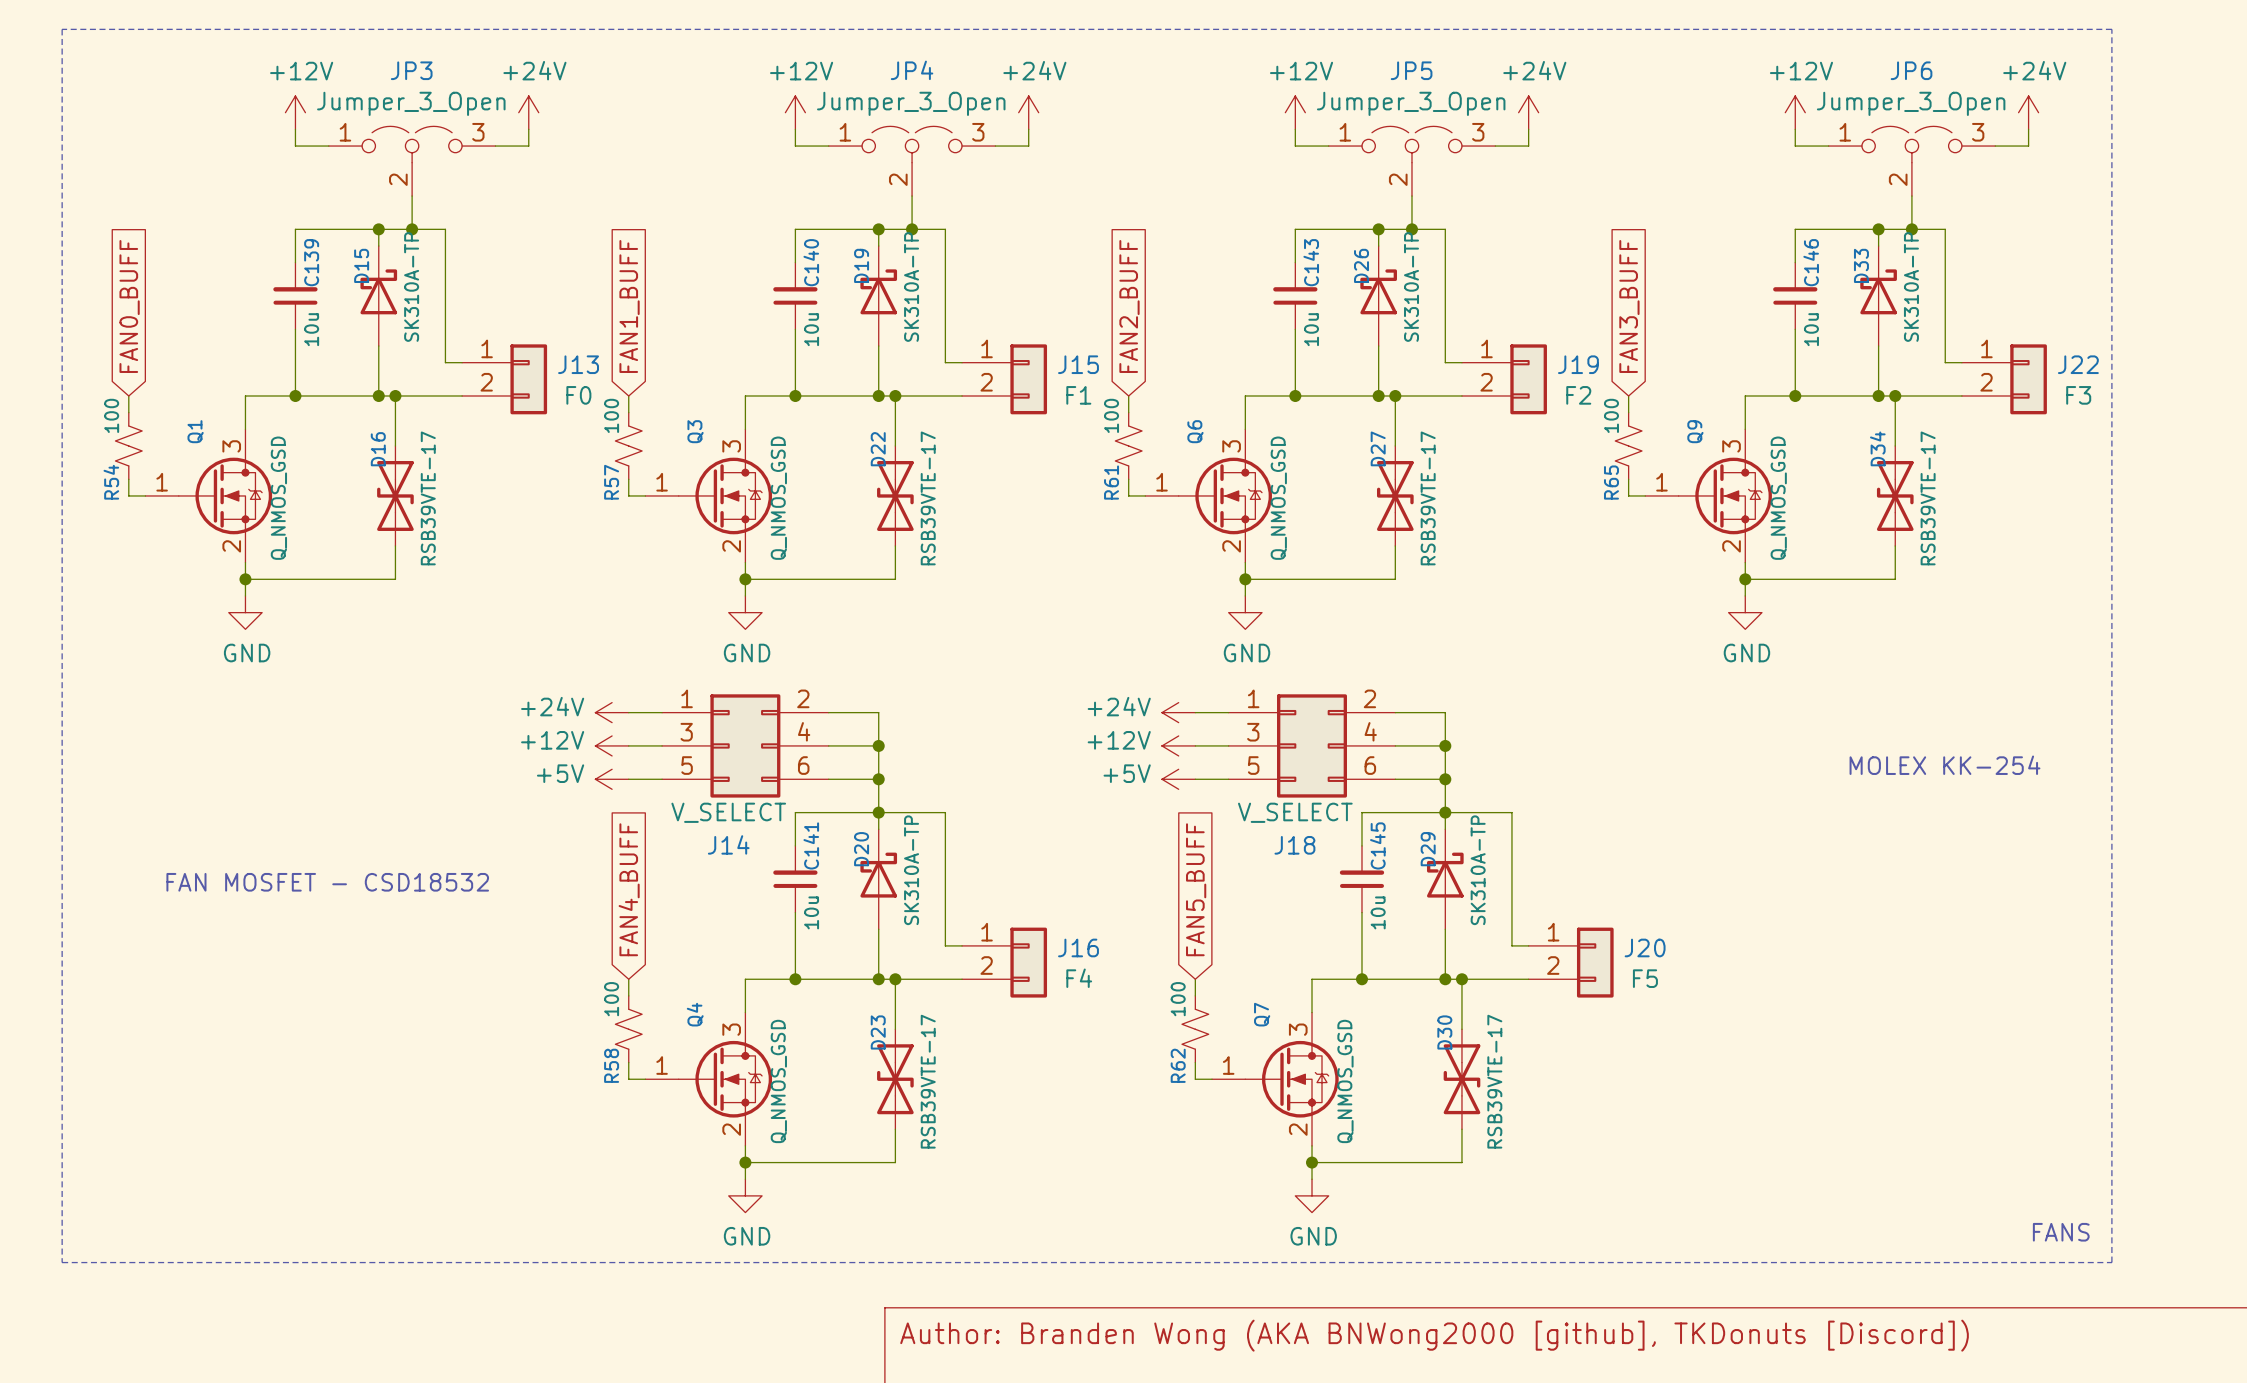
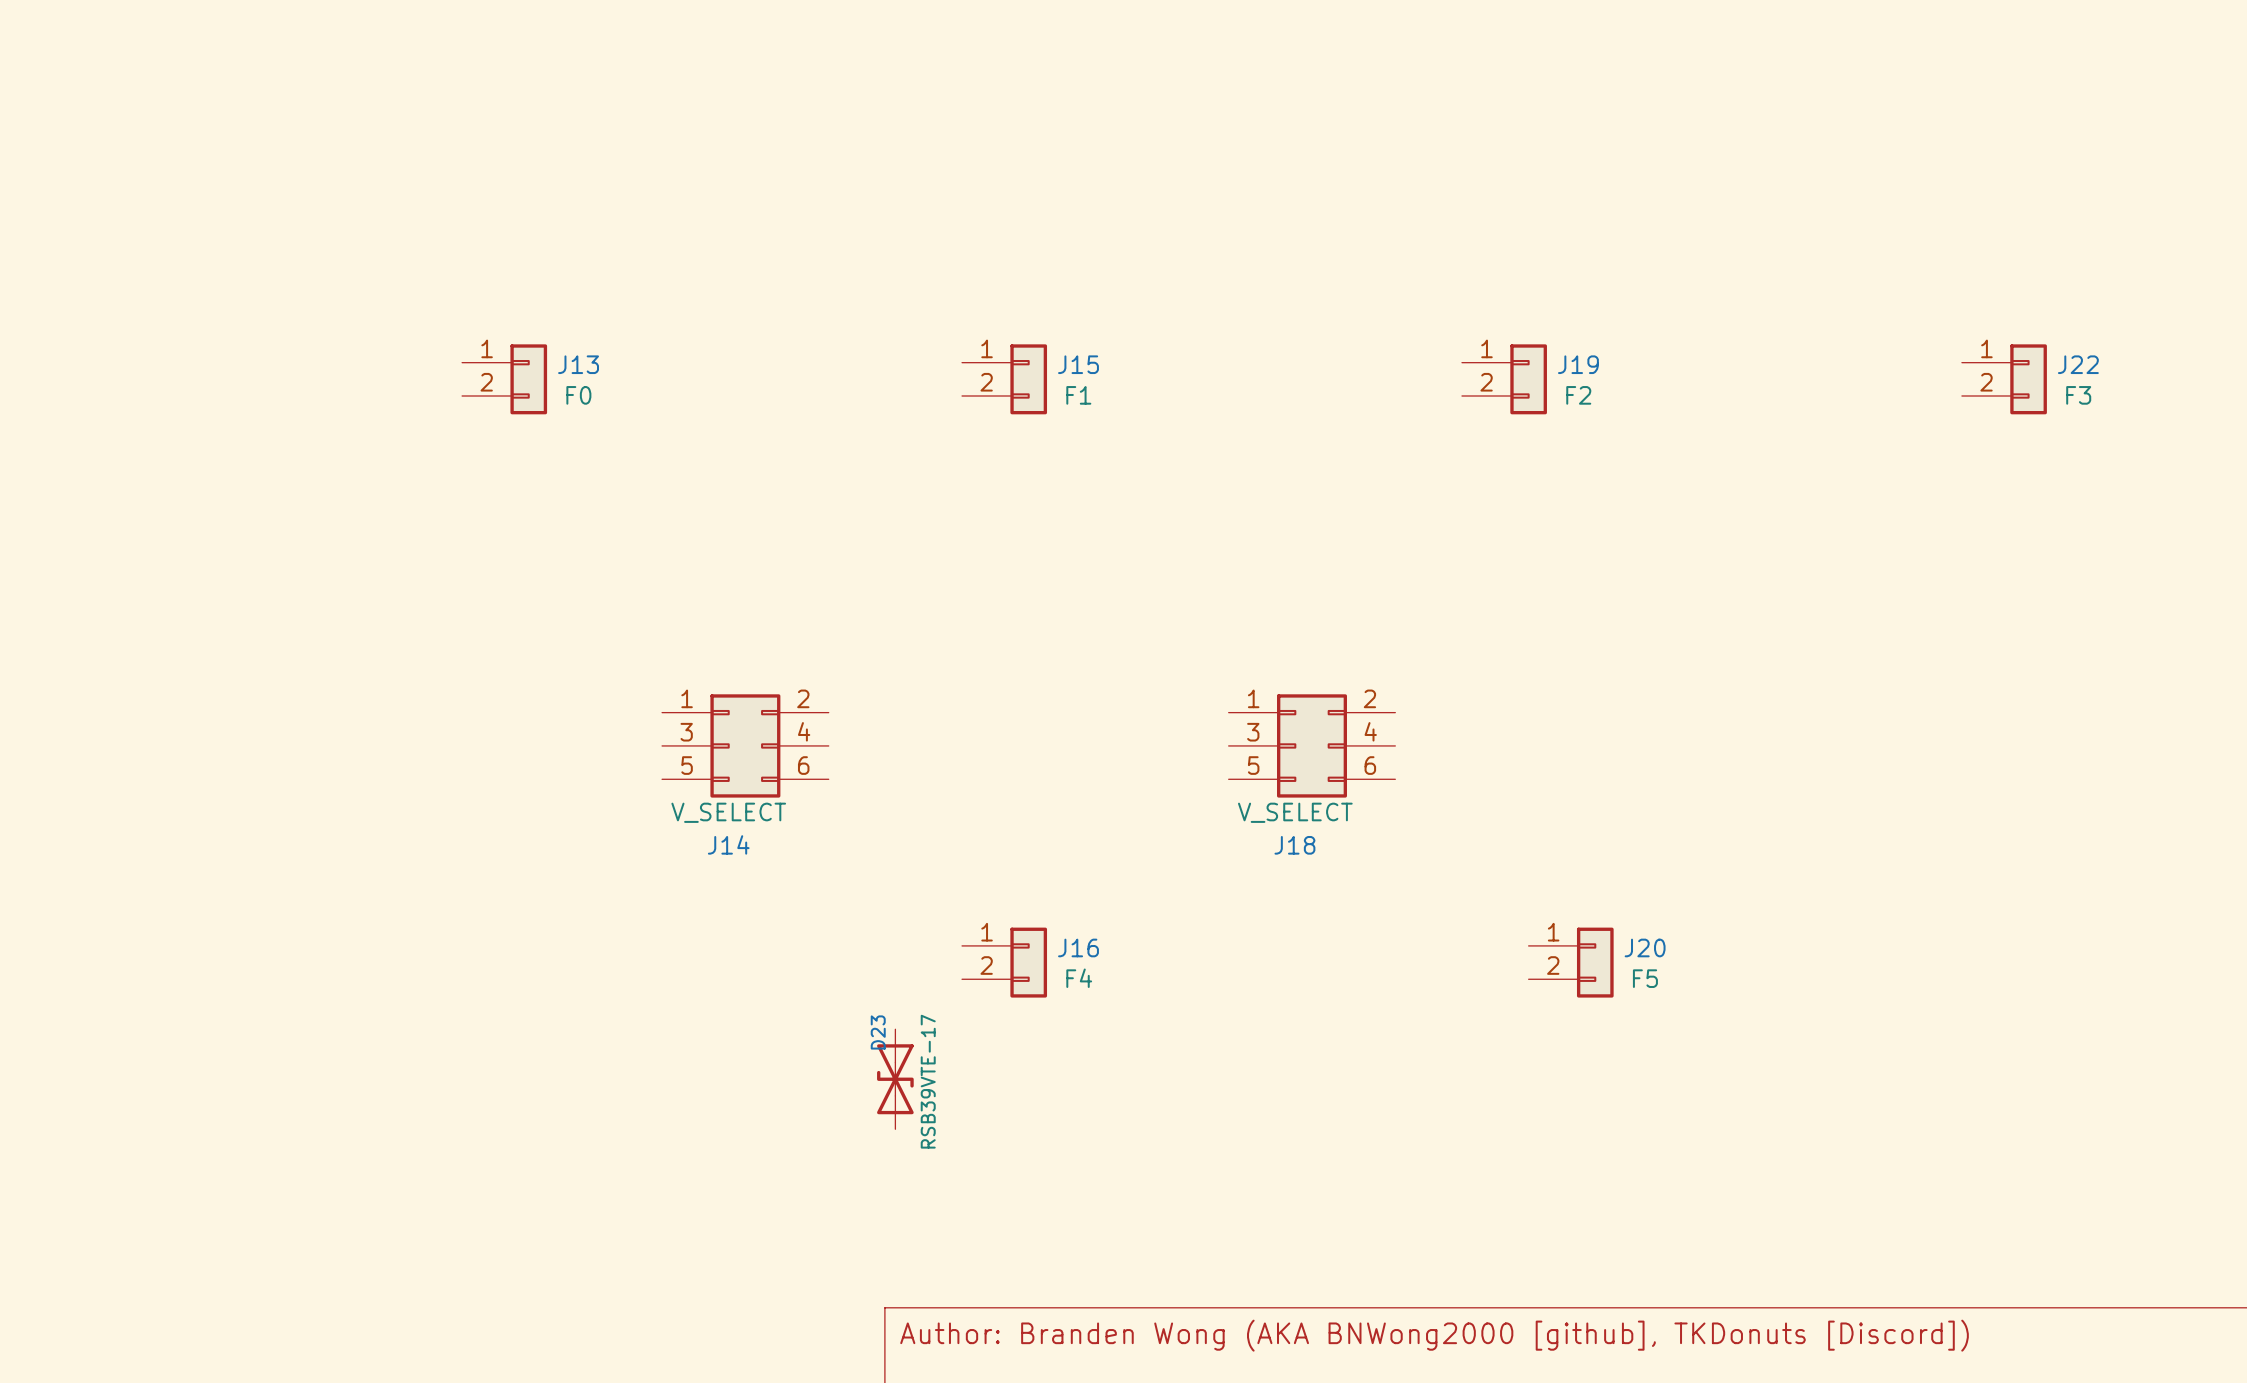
line: (62, 29) (62, 1262) (2111, 1262) (2111, 29) (62, 29) -> none
power symbol: +12V (295, 112) -> none
power symbol: +24V (528, 112) -> none
power symbol: +12V (795, 112) -> none
power symbol: +24V (1028, 112) -> none
power symbol: +12V (1295, 112) -> none
power symbol: +24V (1528, 112) -> none
power symbol: +12V (1795, 112) -> none
power symbol: +24V (2028, 112) -> none
wire: (295, 129) (295, 146) (328, 146) -> none
wire: (528, 129) (528, 146) (495, 146) -> none
wire: (795, 129) (795, 146) (828, 146) -> none
wire: (1028, 129) (1028, 146) (995, 146) -> none
wire: (1295, 129) (1295, 146) (1328, 146) -> none
wire: (1528, 129) (1528, 146) (1495, 146) -> none
wire: (1795, 129) (1795, 146) (1828, 146) -> none
wire: (2028, 129) (2028, 146) (1995, 146) -> none
JP3: Jumper_3_Open (412, 161) -> none
JP4: Jumper_3_Open (912, 161) -> none
JP5: Jumper_3_Open (1411, 161) -> none
JP6: Jumper_3_Open (1911, 161) -> none
wire: (412, 196) (412, 229) -> none
wire: (912, 196) (912, 229) -> none
wire: (1411, 196) (1411, 229) -> none
wire: (1911, 196) (1911, 229) -> none
wire: (378, 229) (378, 246) -> none
junction: (378, 229) -> none
junction: (412, 229) -> none
wire: (878, 229) (878, 246) -> none
junction: (878, 229) -> none
junction: (912, 229) -> none
wire: (1378, 229) (1378, 246) -> none
junction: (1378, 229) -> none
junction: (1411, 229) -> none
wire: (1878, 229) (1878, 246) -> none
junction: (1878, 229) -> none
junction: (1911, 229) -> none
wire: (295, 262) (295, 229) (445, 229) (445, 362) (462, 362) -> none
wire: (795, 262) (795, 229) (945, 229) (945, 362) (962, 362) -> none
wire: (1295, 262) (1295, 229) (1445, 229) (1445, 362) (1461, 362) -> none
wire: (1795, 262) (1795, 229) (1945, 229) (1945, 362) (1961, 362) -> none
C139: 10u (295, 296) -> none
D15: SK310A-TP (378, 296) -> none
C140: 10u (795, 296) -> none
D19: SK310A-TP (878, 296) -> none
C143: 10u (1295, 296) -> none
D26: SK310A-TP (1378, 296) -> none
C146: 10u (1795, 296) -> none
D33: SK310A-TP (1878, 296) -> none
global label: FAN0_BUFF (129, 306) -> none
global label: FAN1_BUFF (629, 306) -> none
global label: FAN2_BUFF (1129, 306) -> none
global label: FAN3_BUFF (1629, 306) -> none
wire: (295, 329) (295, 395) -> none
wire: (795, 329) (795, 395) -> none
wire: (1295, 329) (1295, 395) -> none
wire: (1795, 329) (1795, 395) -> none
wire: (378, 346) (378, 395) -> none
wire: (878, 346) (878, 395) -> none
wire: (1378, 346) (1378, 395) -> none
wire: (1878, 346) (1878, 395) -> none
wire: (128, 395) (128, 412) -> none
junction: (295, 395) -> none
junction: (378, 395) -> none
wire: (395, 395) (395, 445) -> none
junction: (395, 395) -> none
wire: (462, 395) (245, 395) (245, 429) -> none
wire: (628, 395) (628, 412) -> none
junction: (795, 395) -> none
junction: (878, 395) -> none
wire: (895, 395) (895, 445) -> none
junction: (895, 395) -> none
wire: (962, 395) (745, 395) (745, 429) -> none
wire: (1128, 395) (1128, 412) -> none
junction: (1295, 395) -> none
junction: (1378, 395) -> none
wire: (1395, 395) (1395, 445) -> none
junction: (1395, 395) -> none
wire: (1461, 395) (1245, 395) (1245, 429) -> none
wire: (1628, 395) (1628, 412) -> none
junction: (1795, 395) -> none
junction: (1878, 395) -> none
wire: (1895, 395) (1895, 445) -> none
junction: (1895, 395) -> none
wire: (1961, 395) (1745, 395) (1745, 429) -> none
R54: 100 (128, 445) -> none
R57: 100 (628, 445) -> none
R61: 100 (1128, 445) -> none
R65: 100 (1628, 445) -> none
wire: (128, 479) (128, 495) (145, 495) -> none
wire: (628, 479) (628, 495) (645, 495) -> none
wire: (1128, 479) (1128, 495) (1145, 495) -> none
wire: (1628, 479) (1628, 495) (1645, 495) -> none
Q1: Q_NMOS_GSD (208, 495) -> none
D16: RSB39VTE-17 (395, 495) -> none
Q3: Q_NMOS_GSD (708, 495) -> none
D22: RSB39VTE-17 (895, 495) -> none
Q6: Q_NMOS_GSD (1208, 495) -> none
D27: RSB39VTE-17 (1395, 495) -> none
Q9: Q_NMOS_GSD (1708, 495) -> none
D34: RSB39VTE-17 (1895, 495) -> none
wire: (395, 545) (395, 579) (245, 579) -> none
wire: (895, 545) (895, 579) (745, 579) -> none
wire: (1395, 545) (1395, 579) (1245, 579) -> none
wire: (1895, 545) (1895, 579) (1745, 579) -> none
wire: (245, 562) (245, 595) -> none
wire: (745, 562) (745, 595) -> none
wire: (1245, 562) (1245, 595) -> none
wire: (1745, 562) (1745, 595) -> none
junction: (245, 579) -> none
junction: (745, 579) -> none
junction: (1245, 579) -> none
junction: (1745, 579) -> none
power symbol: GND (245, 612) -> none
power symbol: GND (745, 612) -> none
power symbol: GND (1245, 612) -> none
power symbol: GND (1745, 612) -> none
power symbol: +24V (612, 712) -> none
wire: (628, 712) (662, 712) -> none
wire: (828, 712) (878, 712) (878, 829) -> none
power symbol: +24V (1178, 712) -> none
wire: (1195, 712) (1228, 712) -> none
wire: (1395, 712) (1445, 712) (1445, 829) -> none
power symbol: +12V (612, 745) -> none
wire: (628, 745) (662, 745) -> none
wire: (828, 745) (878, 745) -> none
junction: (878, 745) -> none
power symbol: +12V (1178, 745) -> none
wire: (1195, 745) (1228, 745) -> none
wire: (1395, 745) (1445, 745) -> none
junction: (1445, 745) -> none
text: MOLEX KK-254 (1944, 765) -> none
power symbol: +5V (612, 779) -> none
wire: (628, 779) (662, 779) -> none
wire: (828, 779) (878, 779) -> none
junction: (878, 779) -> none
power symbol: +5V (1178, 779) -> none
wire: (1195, 779) (1228, 779) -> none
wire: (1395, 779) (1445, 779) -> none
junction: (1445, 779) -> none
junction: (878, 812) -> none
junction: (1445, 812) -> none
wire: (795, 845) (795, 812) (945, 812) (945, 945) (962, 945) -> none
wire: (1361, 845) (1361, 812) (1511, 812) (1511, 945) (1528, 945) -> none
C141: 10u (795, 879) -> none
D20: SK310A-TP (878, 879) -> none
C145: 10u (1361, 879) -> none
D29: SK310A-TP (1445, 879) -> none
text: FAN MOSFET - CSD18532 (327, 882) -> none
global label: FAN4_BUFF (629, 889) -> none
global label: FAN5_BUFF (1196, 889) -> none
wire: (795, 912) (795, 979) -> none
wire: (1361, 912) (1361, 979) -> none
wire: (878, 929) (878, 979) -> none
wire: (1445, 929) (1445, 979) -> none
wire: (628, 979) (628, 995) -> none
junction: (795, 979) -> none
junction: (878, 979) -> none
wire: (895, 979) (895, 1029) -> none
junction: (895, 979) -> none
wire: (962, 979) (745, 979) (745, 1012) -> none
wire: (1195, 979) (1195, 995) -> none
junction: (1361, 979) -> none
junction: (1445, 979) -> none
wire: (1461, 979) (1461, 1029) -> none
junction: (1461, 979) -> none
wire: (1528, 979) (1312, 979) (1312, 1012) -> none
R58: 100 (628, 1029) -> none
R62: 100 (1195, 1029) -> none
wire: (628, 1062) (628, 1079) (645, 1079) -> none
wire: (1195, 1062) (1195, 1079) (1212, 1079) -> none
Q4: Q_NMOS_GSD (708, 1079) -> none
Q7: Q_NMOS_GSD (1275, 1079) -> none
D30: RSB39VTE-17 (1461, 1079) -> none
wire: (895, 1129) (895, 1162) (745, 1162) -> none
wire: (1461, 1129) (1461, 1162) (1312, 1162) -> none
wire: (745, 1145) (745, 1179) -> none
wire: (1312, 1145) (1312, 1179) -> none
junction: (745, 1162) -> none
junction: (1312, 1162) -> none
power symbol: GND (745, 1195) -> none
power symbol: GND (1312, 1195) -> none
text: FANS (2061, 1232) -> none

